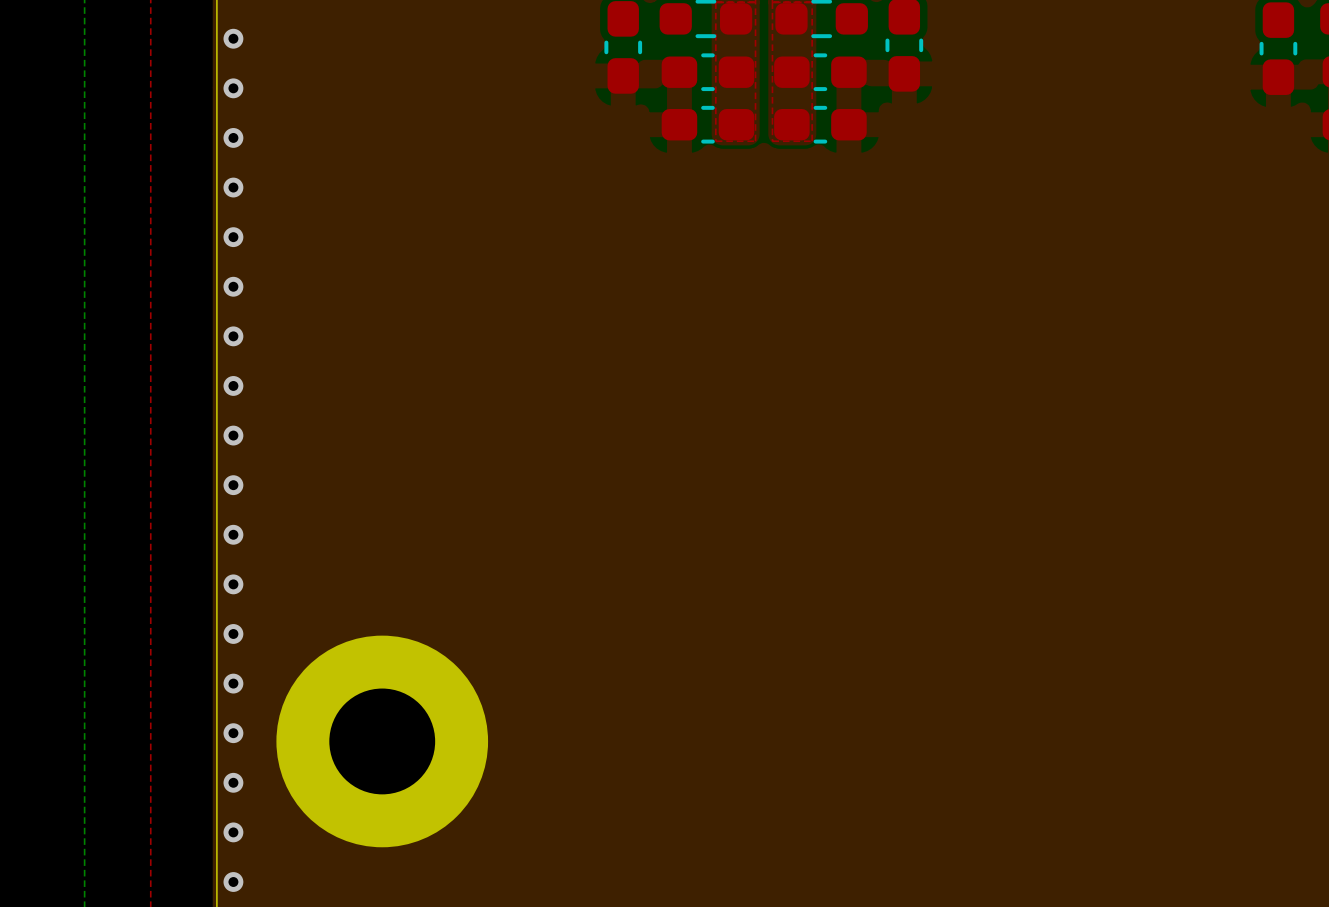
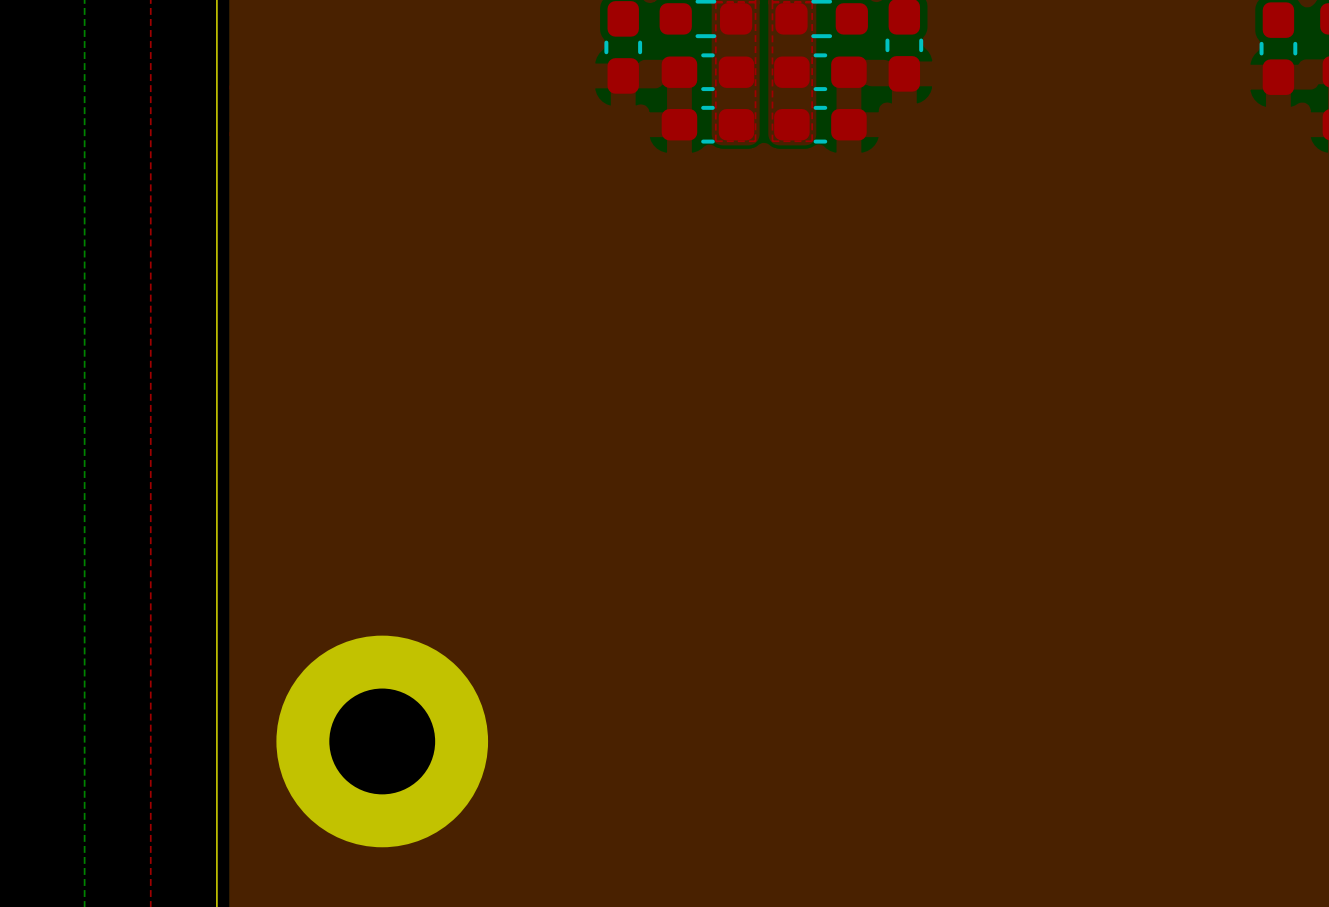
via: (233, 38) -> none
via: (233, 88) -> none
via: (233, 137) -> none
via: (233, 187) -> none
via: (233, 237) -> none
via: (233, 286) -> none
via: (233, 336) -> none
via: (233, 385) -> none
via: (233, 435) -> none
via: (233, 485) -> none
via: (233, 534) -> none
via: (233, 584) -> none
via: (233, 633) -> none
via: (233, 683) -> none
via: (233, 733) -> none
via: (233, 782) -> none
via: (233, 832) -> none
via: (233, 882) -> none

